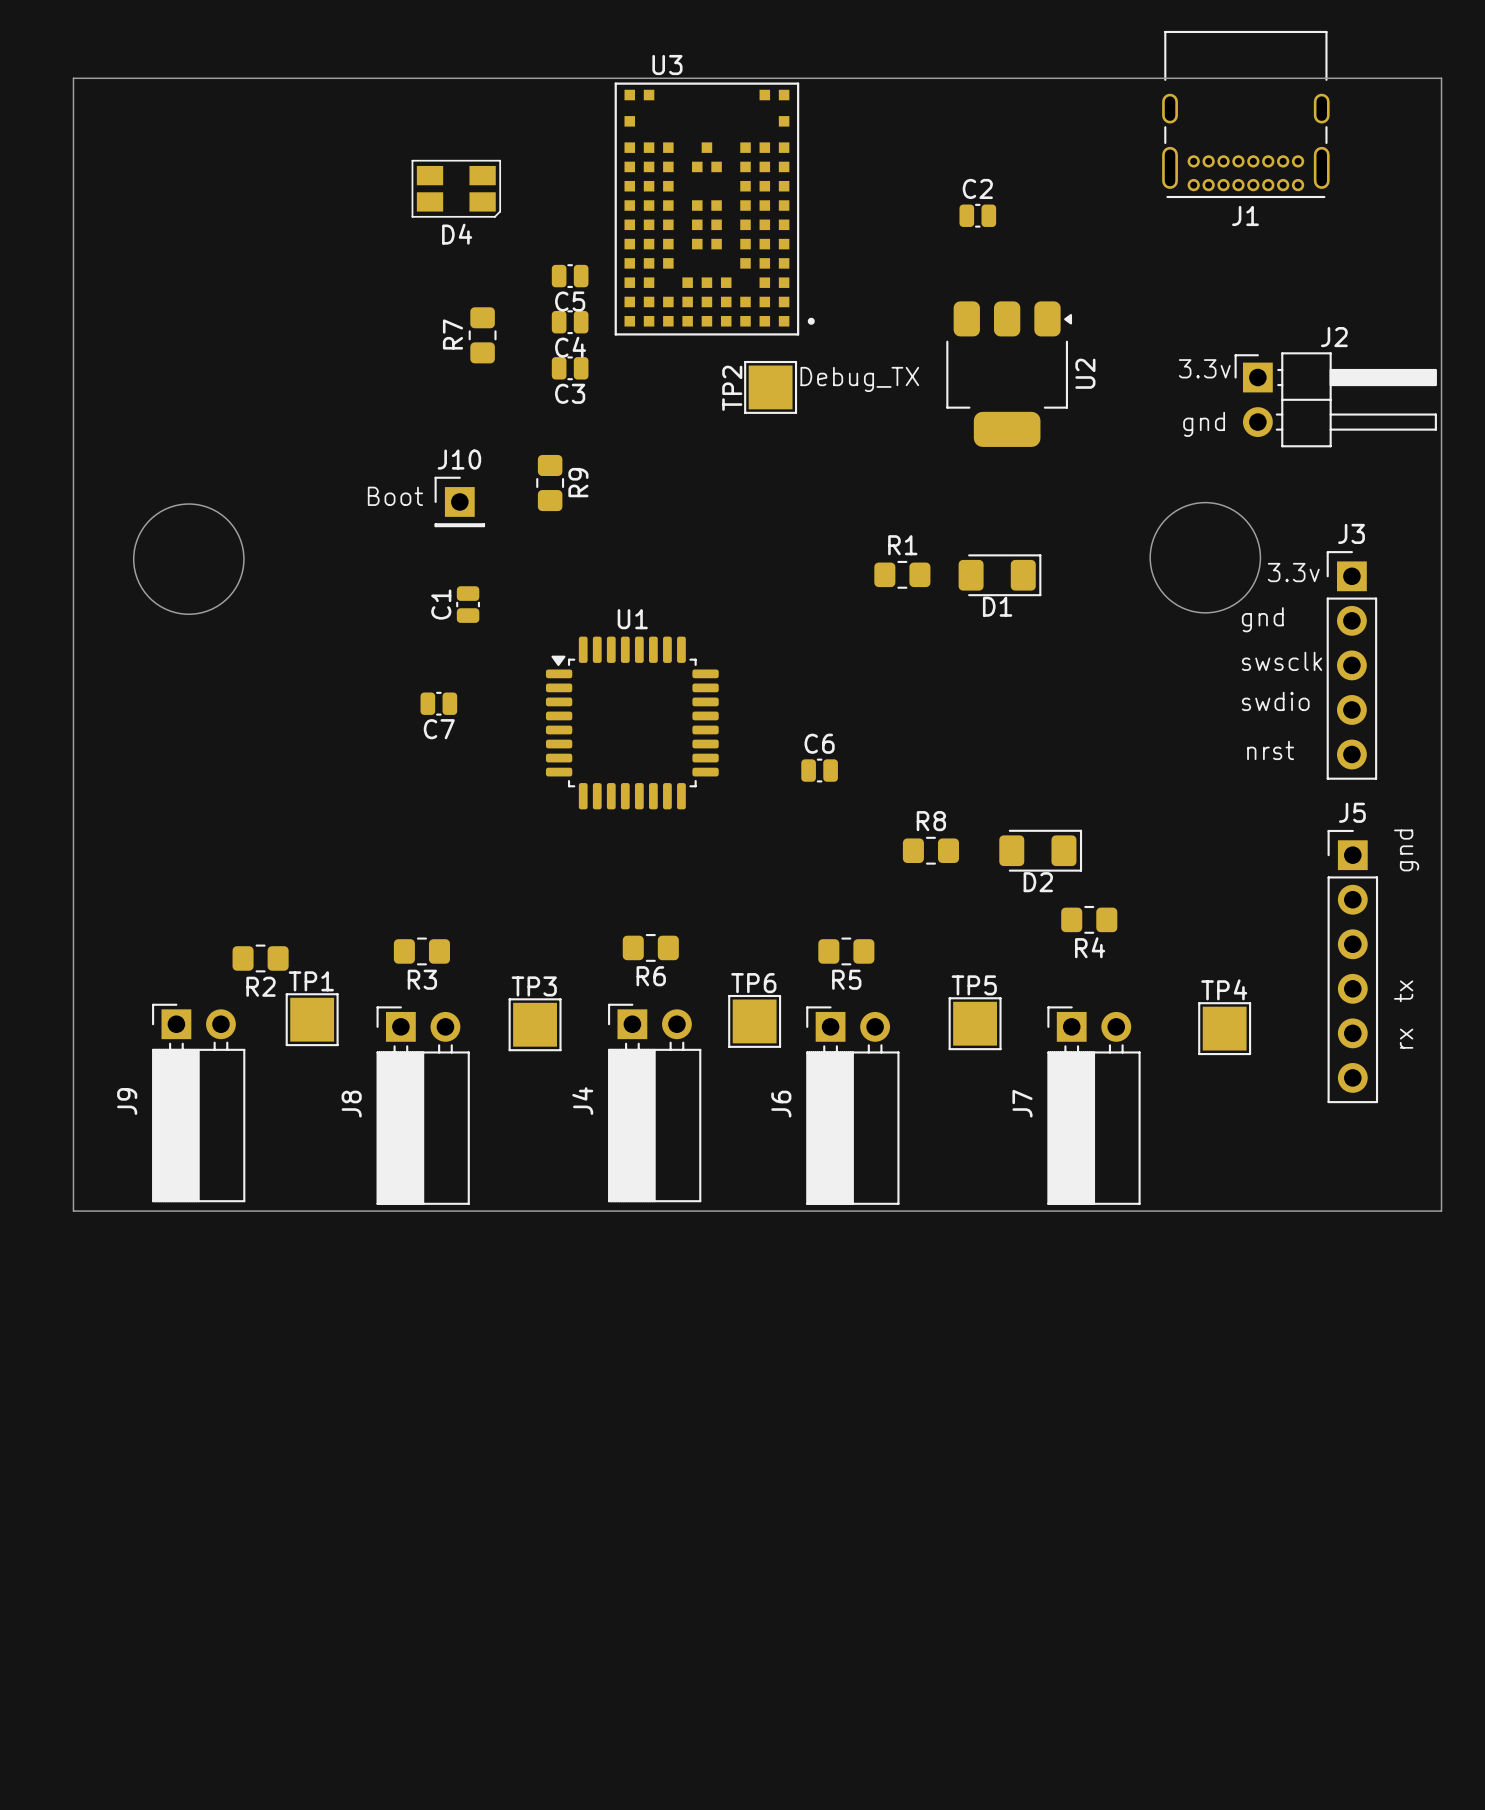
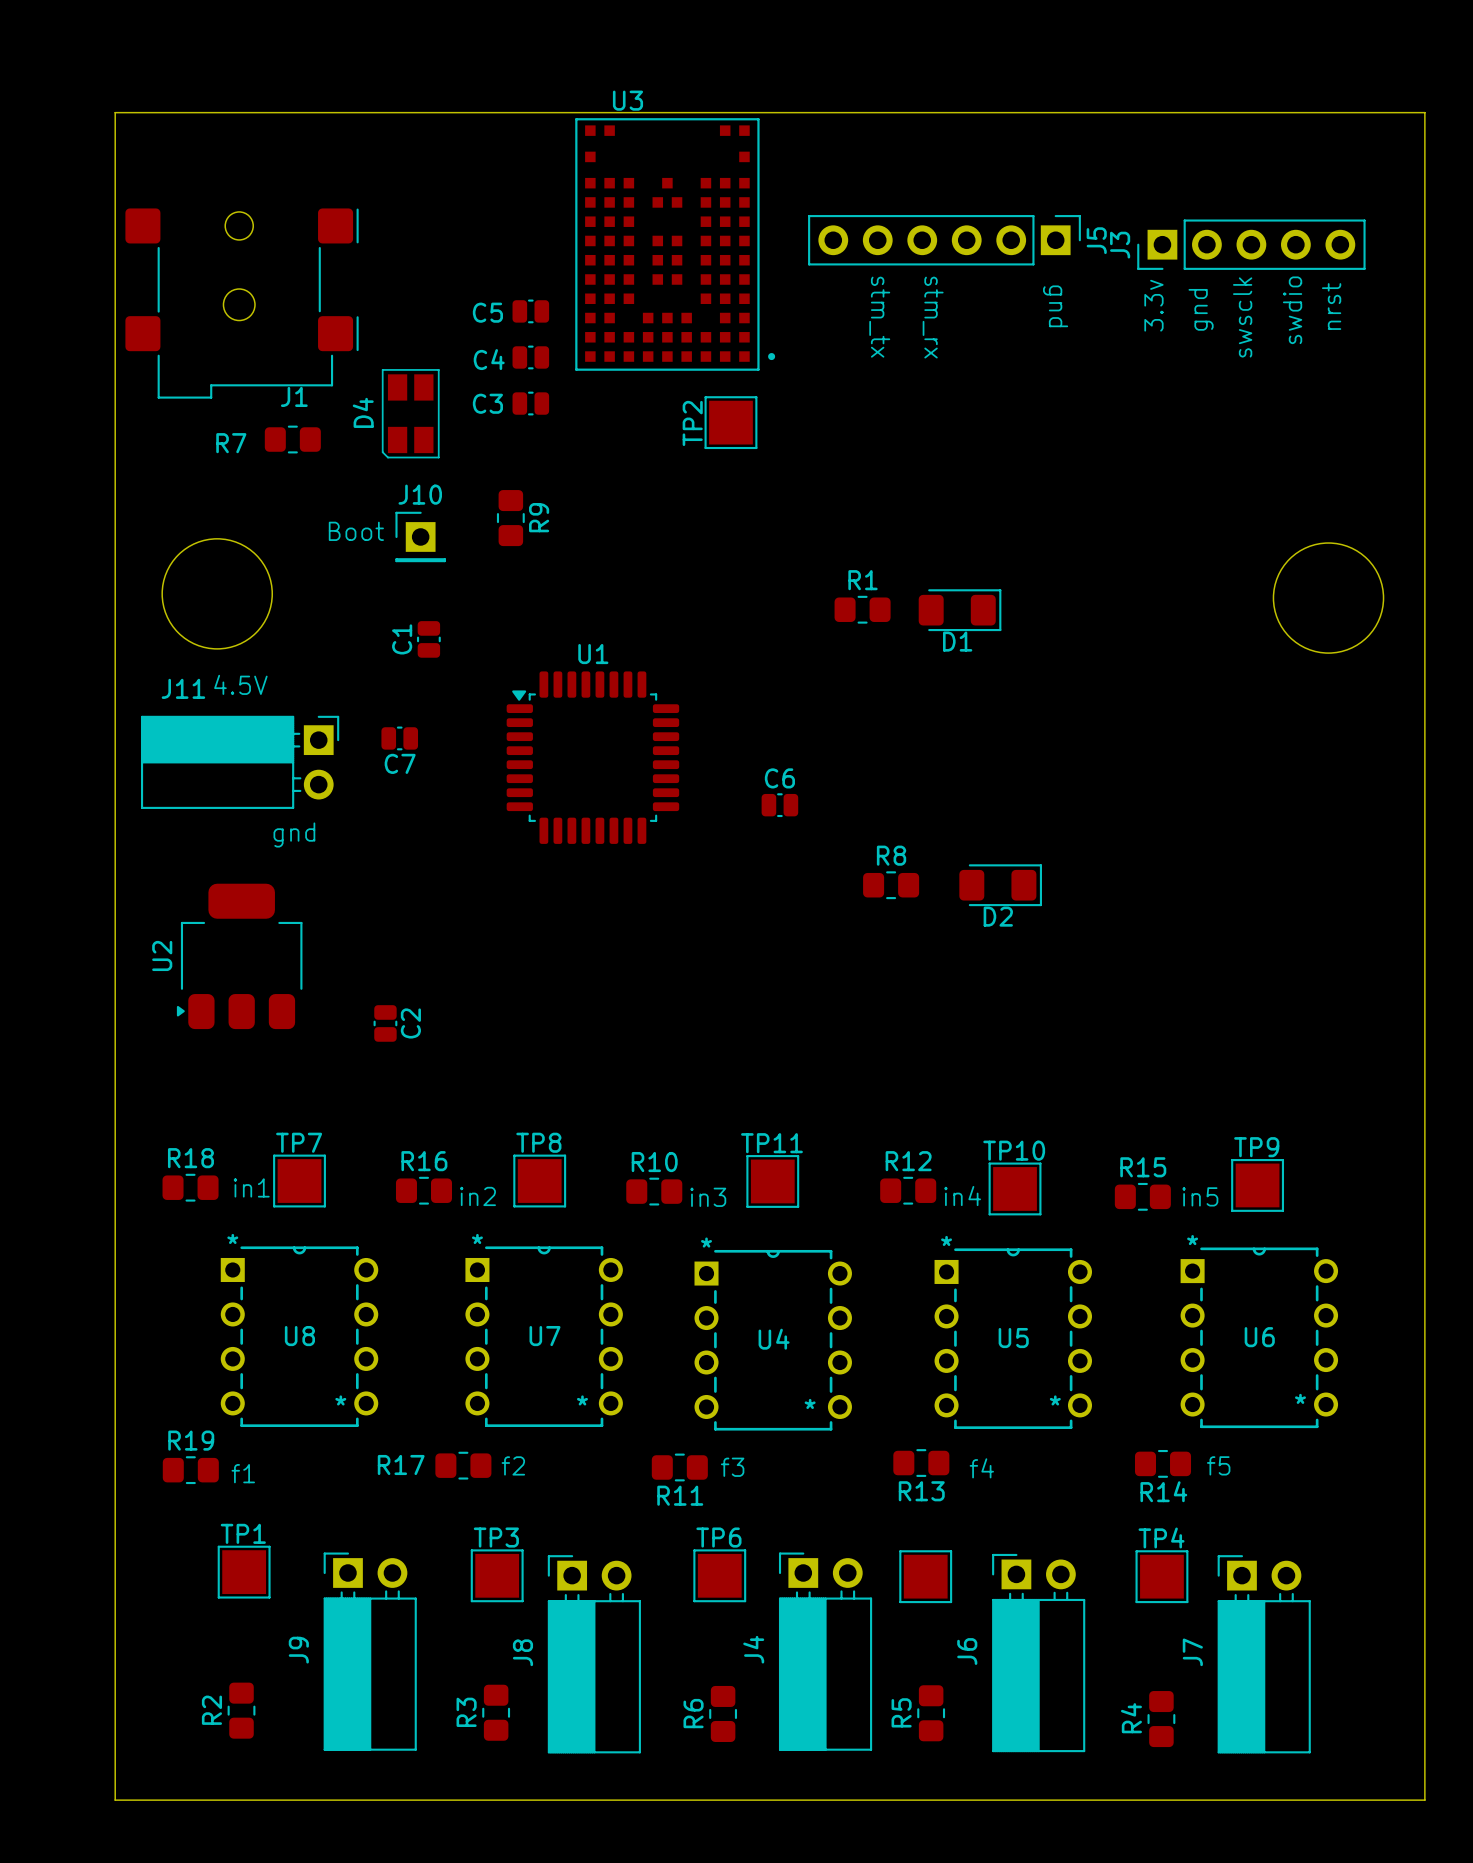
J1 footprint: [1162, 30, 1330, 199] -> [125, 208, 359, 399]
board edge: (73, 78) (1441, 78) (1441, 1211) (73, 1211) (73, 78) -> (115, 112) (115, 1800) (1424, 1800) (1424, 112) (115, 112)
D4 rotation: 0° (456, 188) -> 90° clockwise (410, 413)
D4 position: (456, 188) -> (410, 413)
C2 rotation: 0° (977, 215) -> 90° clockwise (385, 1023)
C2 position: (977, 215) -> (385, 1023)
J1 name position: J1 (1245, 215) -> J1 (294, 396)
text: none -> gnd (1055, 306)
text: none -> nrst (1331, 306)
text: none -> gnd (1201, 309)
text: none -> stm_tx (879, 317)
text: none -> stm_rx (933, 317)
C5 name position: C5 (570, 301) -> C5 (487, 312)
R7 rotation: 0° (482, 335) -> 90° clockwise (292, 439)
R7 position: (482, 335) -> (292, 439)
C4 name position: C4 (570, 347) -> C4 (489, 359)
text rotation: 0° (1204, 368) -> 90° counterclockwise (1153, 305)
text position: 3.3v (1204, 368) -> 3.3v (1153, 305)
U2 rotation: 0° (1009, 374) -> 180° (239, 956)
U2 position: (1009, 374) -> (239, 956)
text: Debug_TX (859, 379) -> none
C3 name position: C3 (570, 393) -> C3 (487, 403)
J2: (1335, 399) -> none
text: gnd (1204, 424) -> none
round board edge position: (1205, 557) -> (1328, 598)
round board edge position: (188, 559) -> (217, 593)
text: 3.3v (1293, 572) -> none
text: gnd (1262, 619) -> none
text: none -> 4.5V (240, 684)
text rotation: 0° (1282, 661) -> 90° counterclockwise (1242, 317)
text position: swsclk (1282, 661) -> swsclk (1242, 317)
J3 rotation: 0° (1351, 665) -> 90° counterclockwise (1251, 244)
J3 position: (1351, 665) -> (1251, 244)
text rotation: 0° (1275, 701) -> 90° counterclockwise (1292, 310)
text position: swdio (1275, 701) -> swdio (1292, 310)
J11: none -> (240, 762)
text: nrst (1270, 750) -> none
text: none -> gnd (294, 834)
text: gnd (1406, 850) -> none
R4 rotation: 0° (1089, 919) -> 90° clockwise (1161, 1719)
R4 position: (1089, 919) -> (1161, 1719)
R6 rotation: 0° (650, 947) -> 90° clockwise (723, 1713)
R6 position: (650, 947) -> (723, 1713)
R3 rotation: 0° (421, 951) -> 90° clockwise (496, 1712)
R3 position: (421, 951) -> (496, 1712)
R5 rotation: 0° (846, 951) -> 90° clockwise (931, 1713)
R5 position: (846, 951) -> (931, 1713)
R2 rotation: 0° (260, 958) -> 90° clockwise (241, 1710)
R2 position: (260, 958) -> (241, 1710)
J5 rotation: 0° (1352, 966) -> 90° clockwise (944, 240)
J5 position: (1352, 966) -> (944, 240)
text: tx (1403, 991) -> none
TP1 position: (312, 1019) -> (244, 1572)
TP6 position: (754, 1021) -> (719, 1575)
TP5: (975, 1023) -> none
TP3 position: (535, 1024) -> (497, 1575)
TP4 position: (1224, 1028) -> (1161, 1576)
text: rx (1406, 1038) -> none
J9 position: (198, 1102) -> (370, 1651)
J4 position: (654, 1102) -> (825, 1651)
J8 position: (423, 1105) -> (594, 1654)
J6 position: (852, 1105) -> (1038, 1653)
J7 position: (1093, 1105) -> (1264, 1654)
TP7: none -> (299, 1181)
TP8: none -> (539, 1181)
TP11: none -> (772, 1181)
TP9: none -> (1257, 1185)
R18: none -> (190, 1187)
text: none -> in1 (251, 1187)
TP10: none -> (1015, 1188)
R16: none -> (423, 1190)
R12: none -> (908, 1190)
R10: none -> (654, 1191)
text: none -> in4 (962, 1196)
text: none -> in2 (477, 1196)
R15: none -> (1142, 1196)
text: none -> in5 (1200, 1196)
text: none -> in3 (708, 1197)
U8: none -> (299, 1336)
U7: none -> (544, 1336)
U6: none -> (1259, 1337)
U5: none -> (1013, 1338)
U4: none -> (773, 1340)
R13: none -> (921, 1463)
R14: none -> (1163, 1463)
R17: none -> (463, 1465)
text: none -> f2 (513, 1465)
text: none -> f5 (1218, 1465)
R11: none -> (679, 1467)
text: none -> f3 (732, 1467)
text: none -> f4 (981, 1468)
R19: none -> (190, 1470)
text: none -> f1 (243, 1473)
part: none -> (925, 1576)

